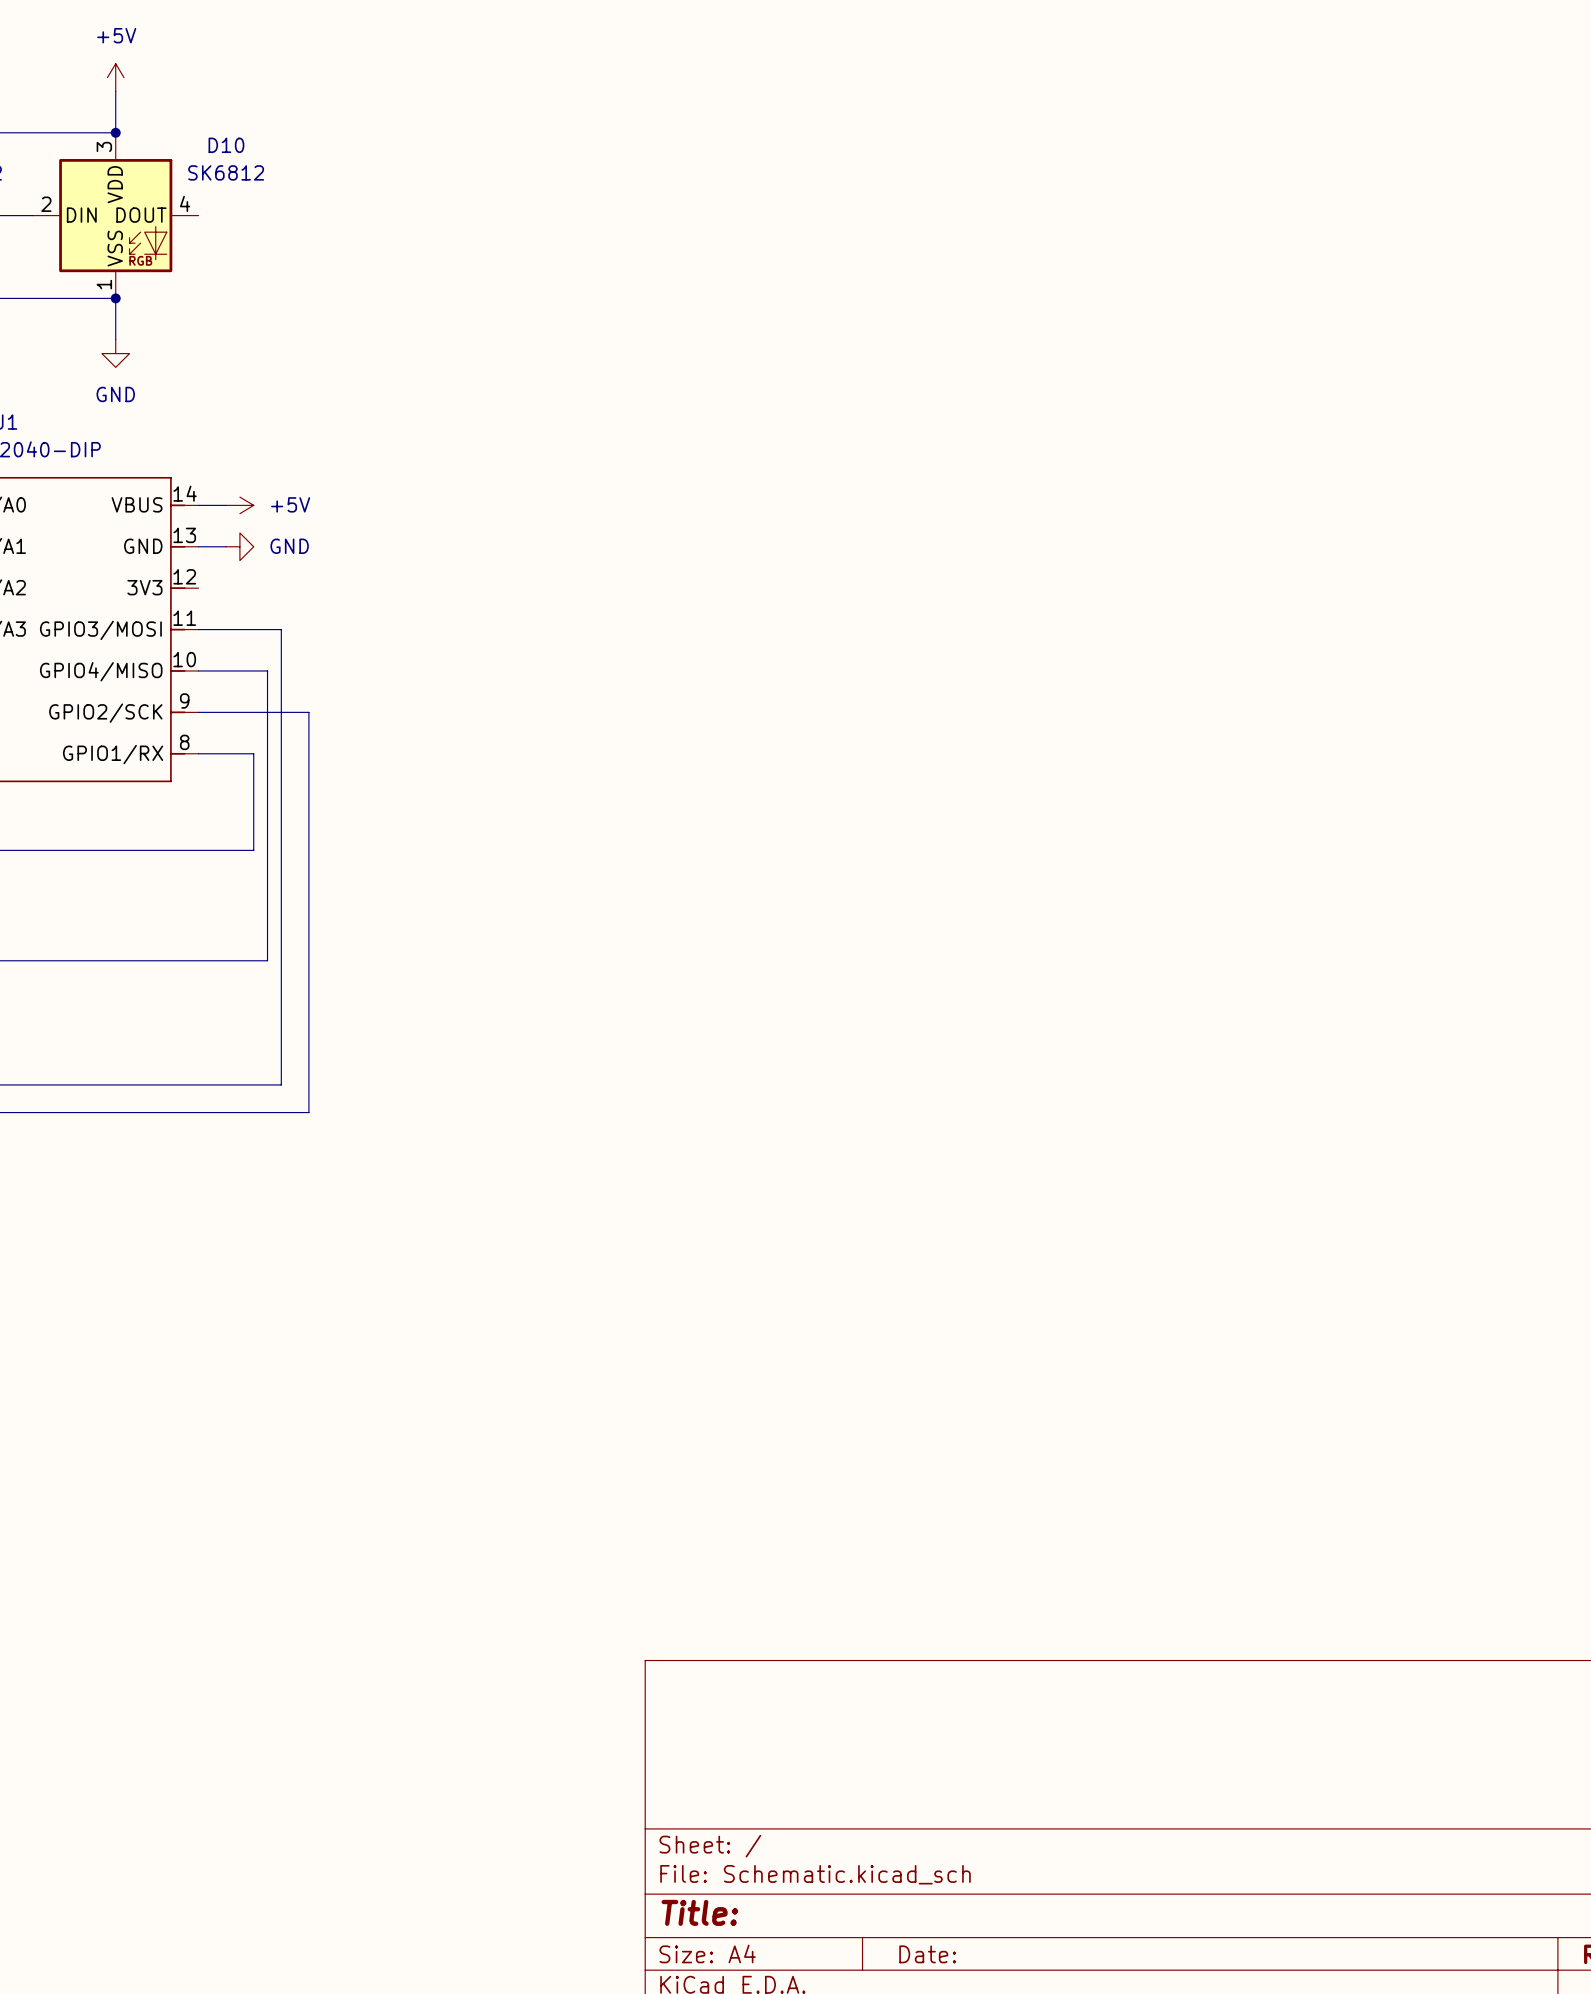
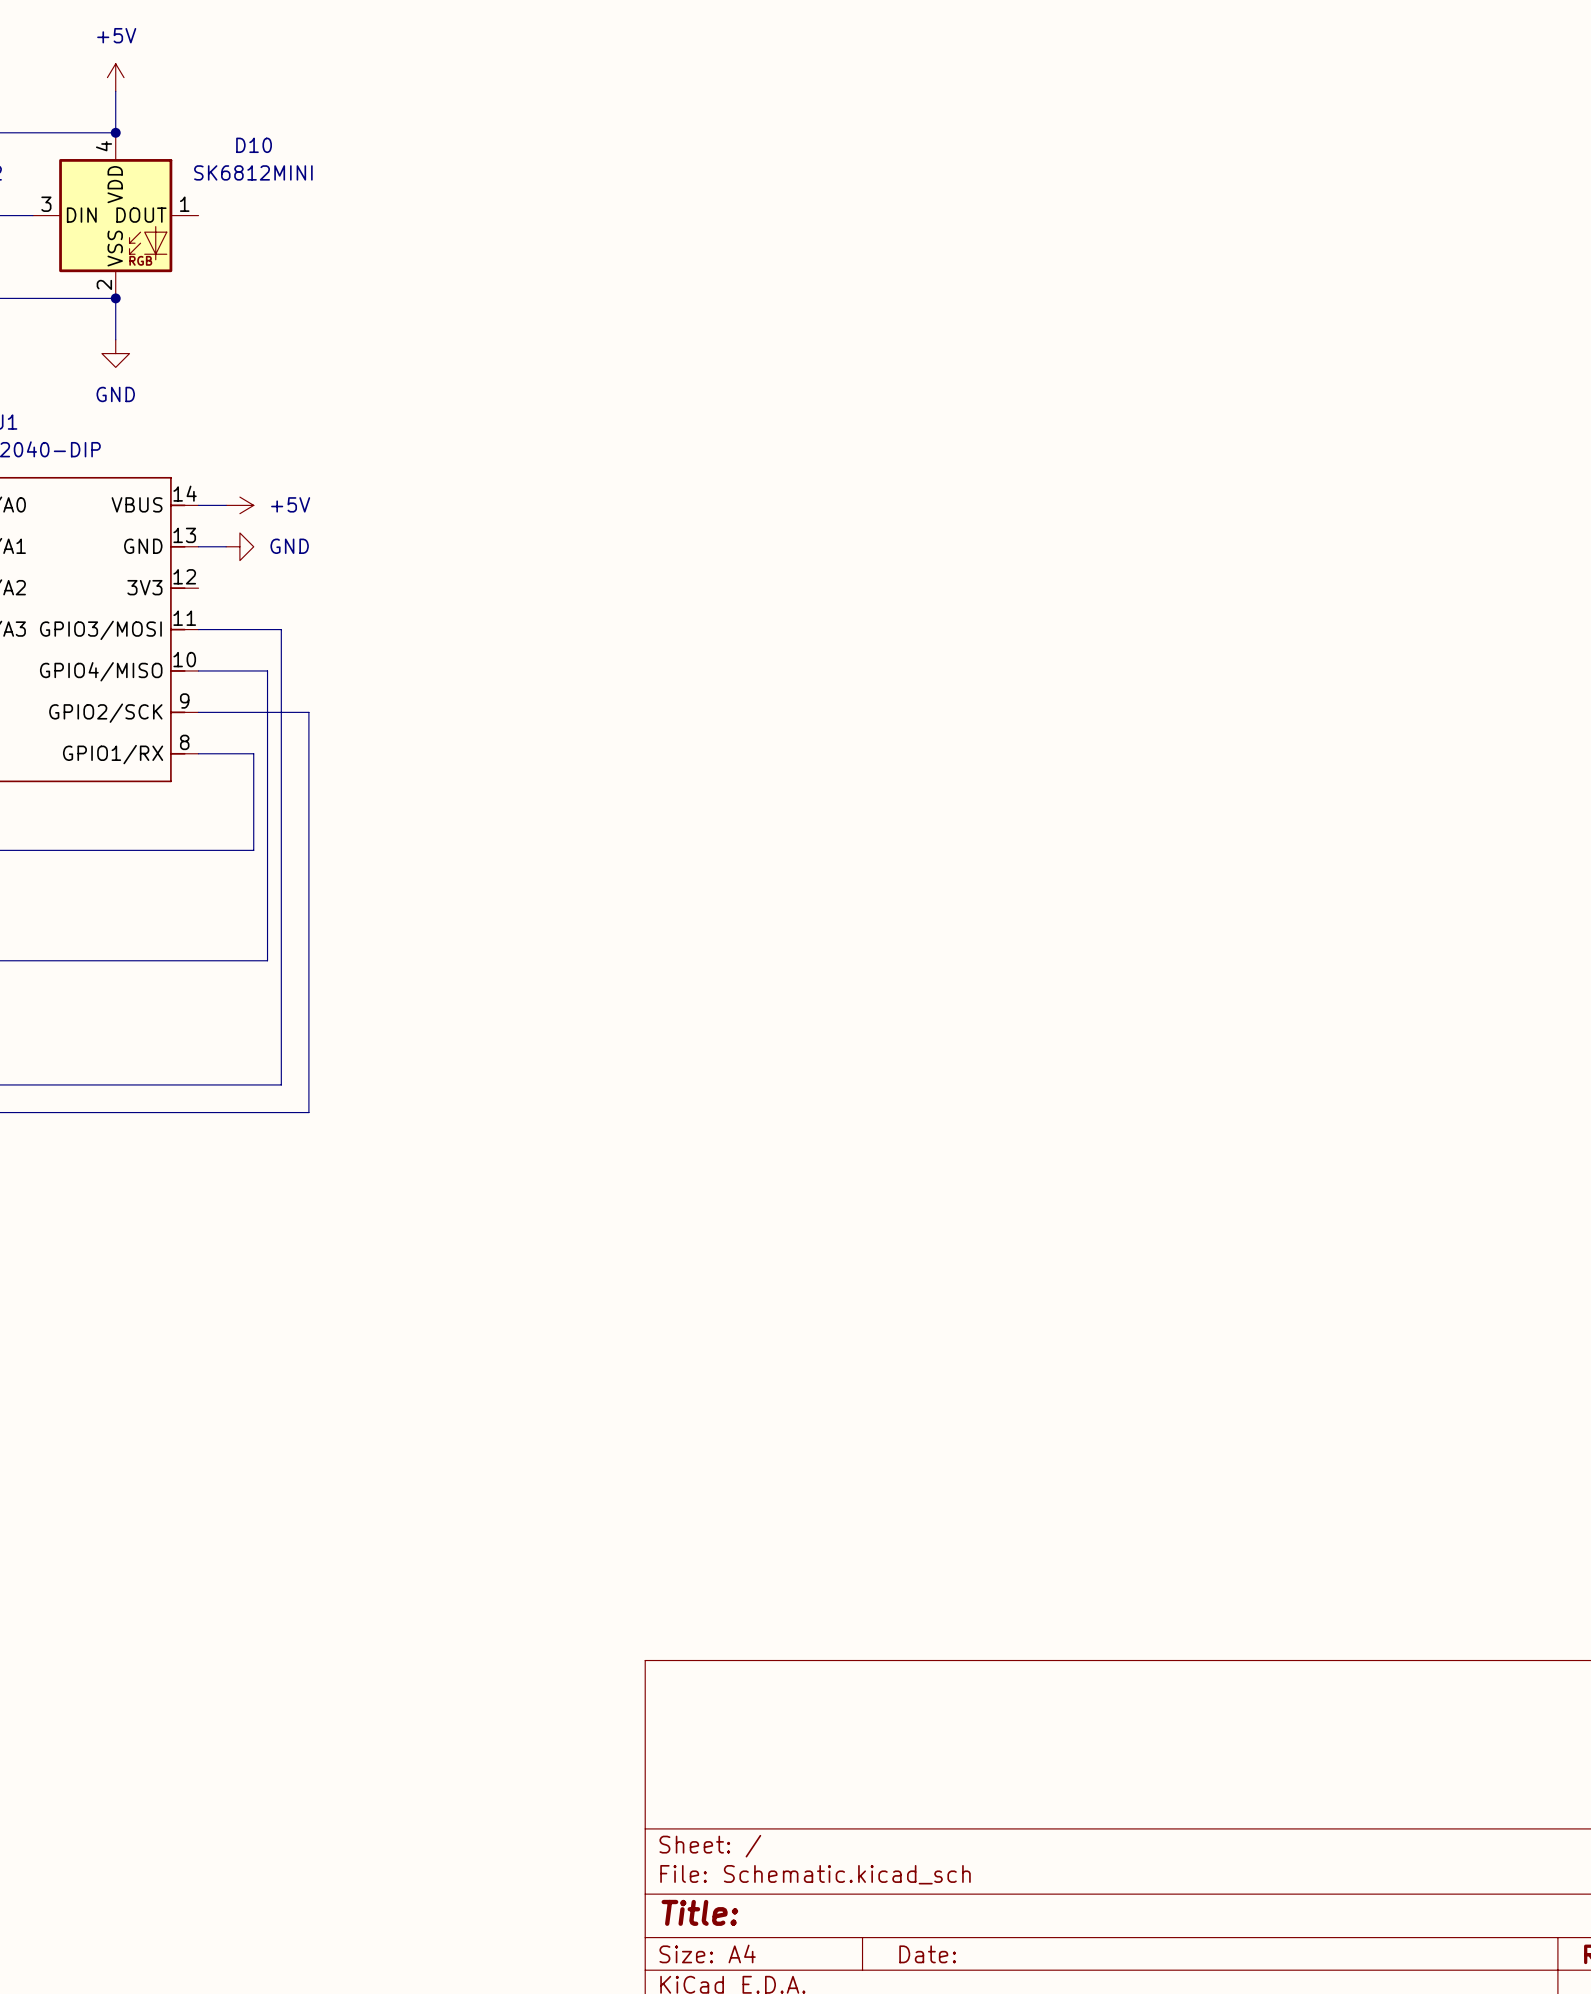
D10 name position: D10 (226, 145) -> D10 (254, 145)
D10 pin number: 3 (104, 146) -> 4 (104, 146)
D10 value: SK6812 (226, 172) -> SK6812MINI (253, 172)
D10 pin number: 4 (185, 203) -> 1 (184, 204)
D10 pin number: 2 (46, 204) -> 3 (46, 204)
D10 pin number: 1 (104, 284) -> 2 (104, 284)

